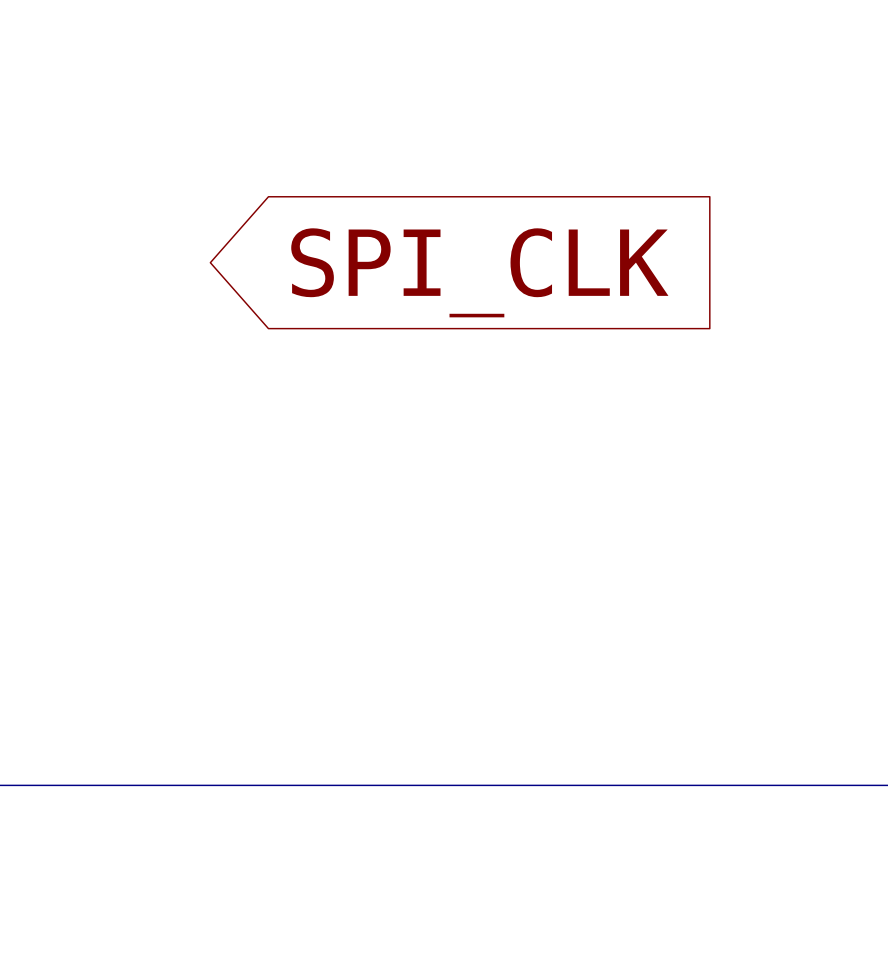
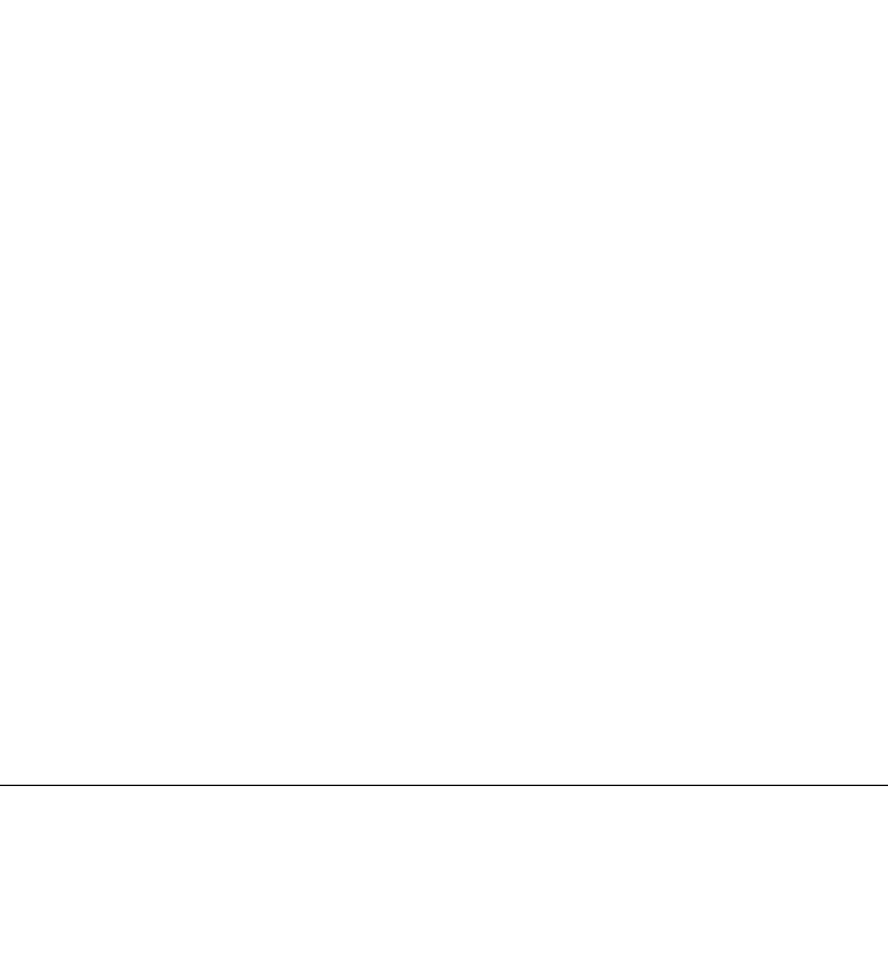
global label: SPI_CLK (479, 272) -> none

